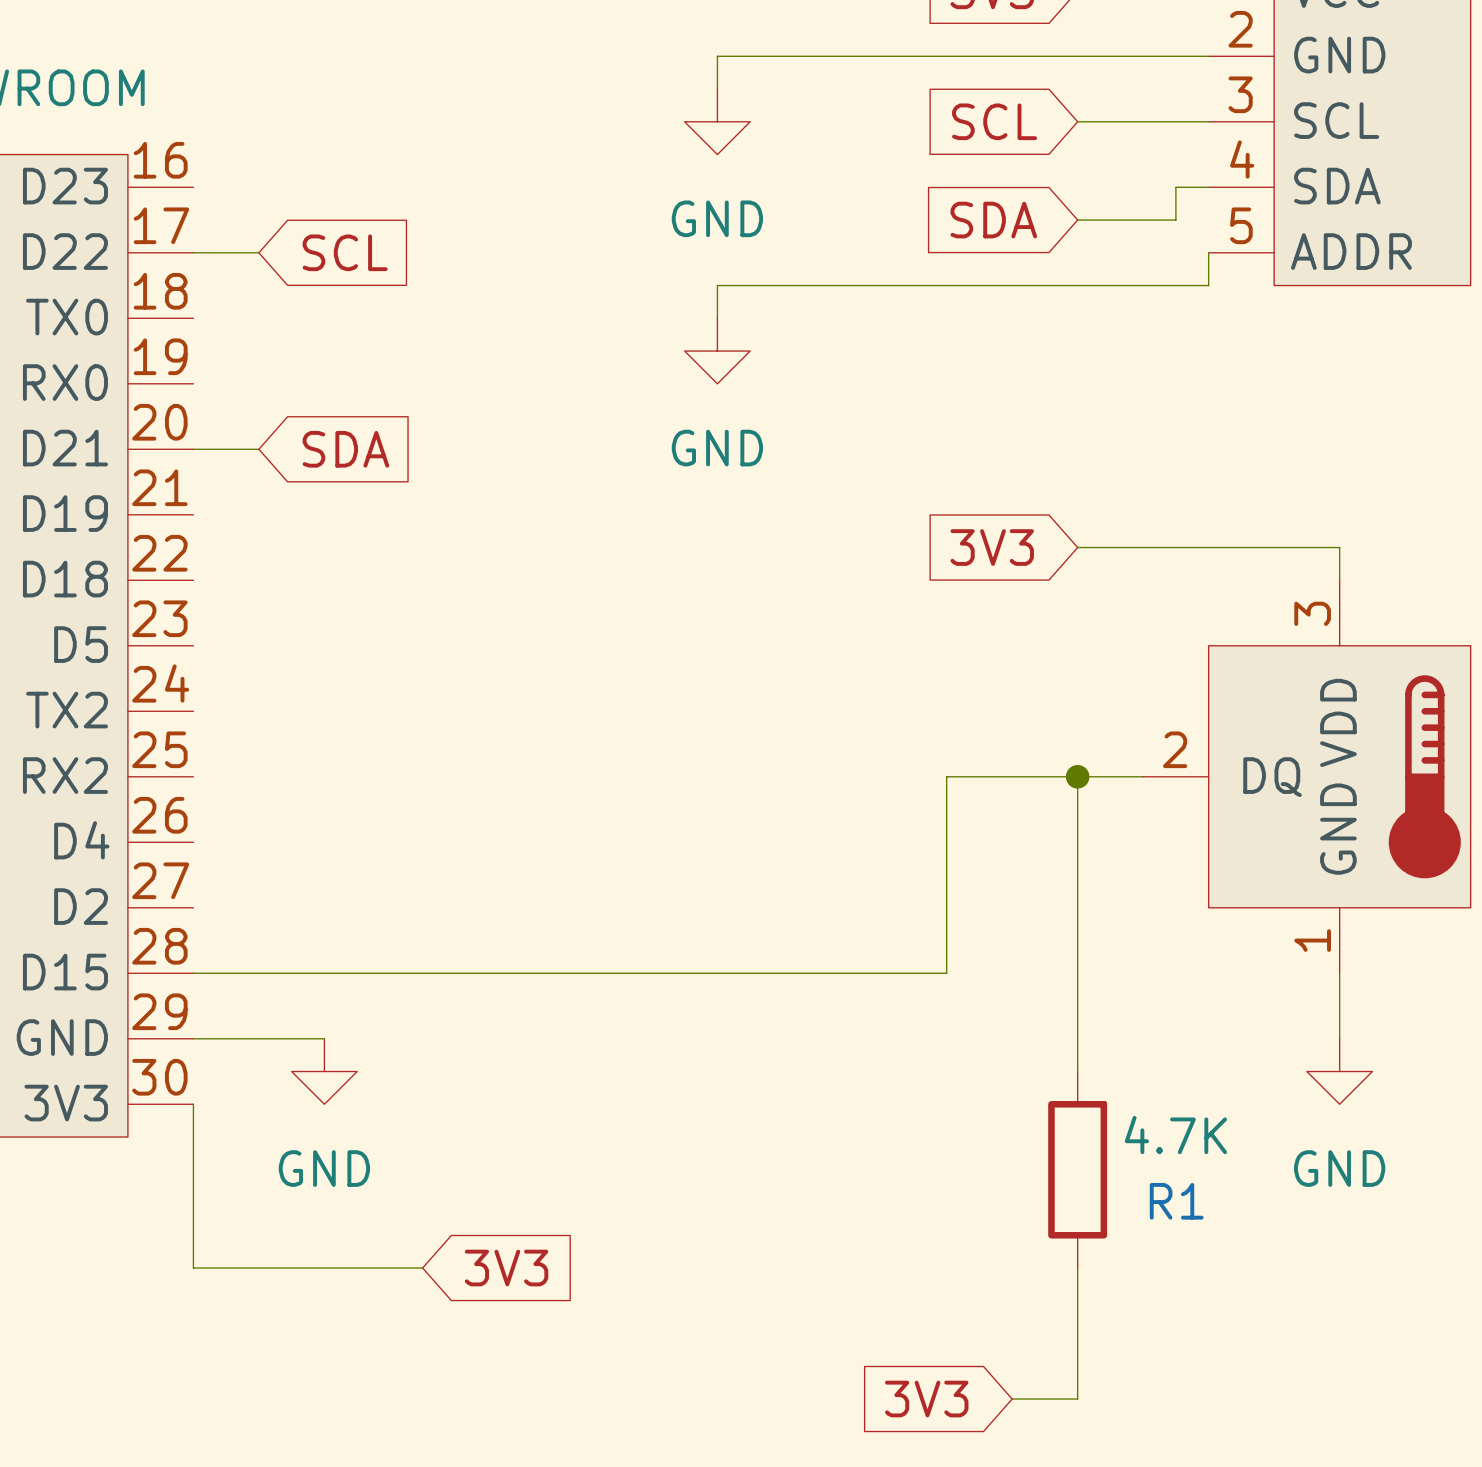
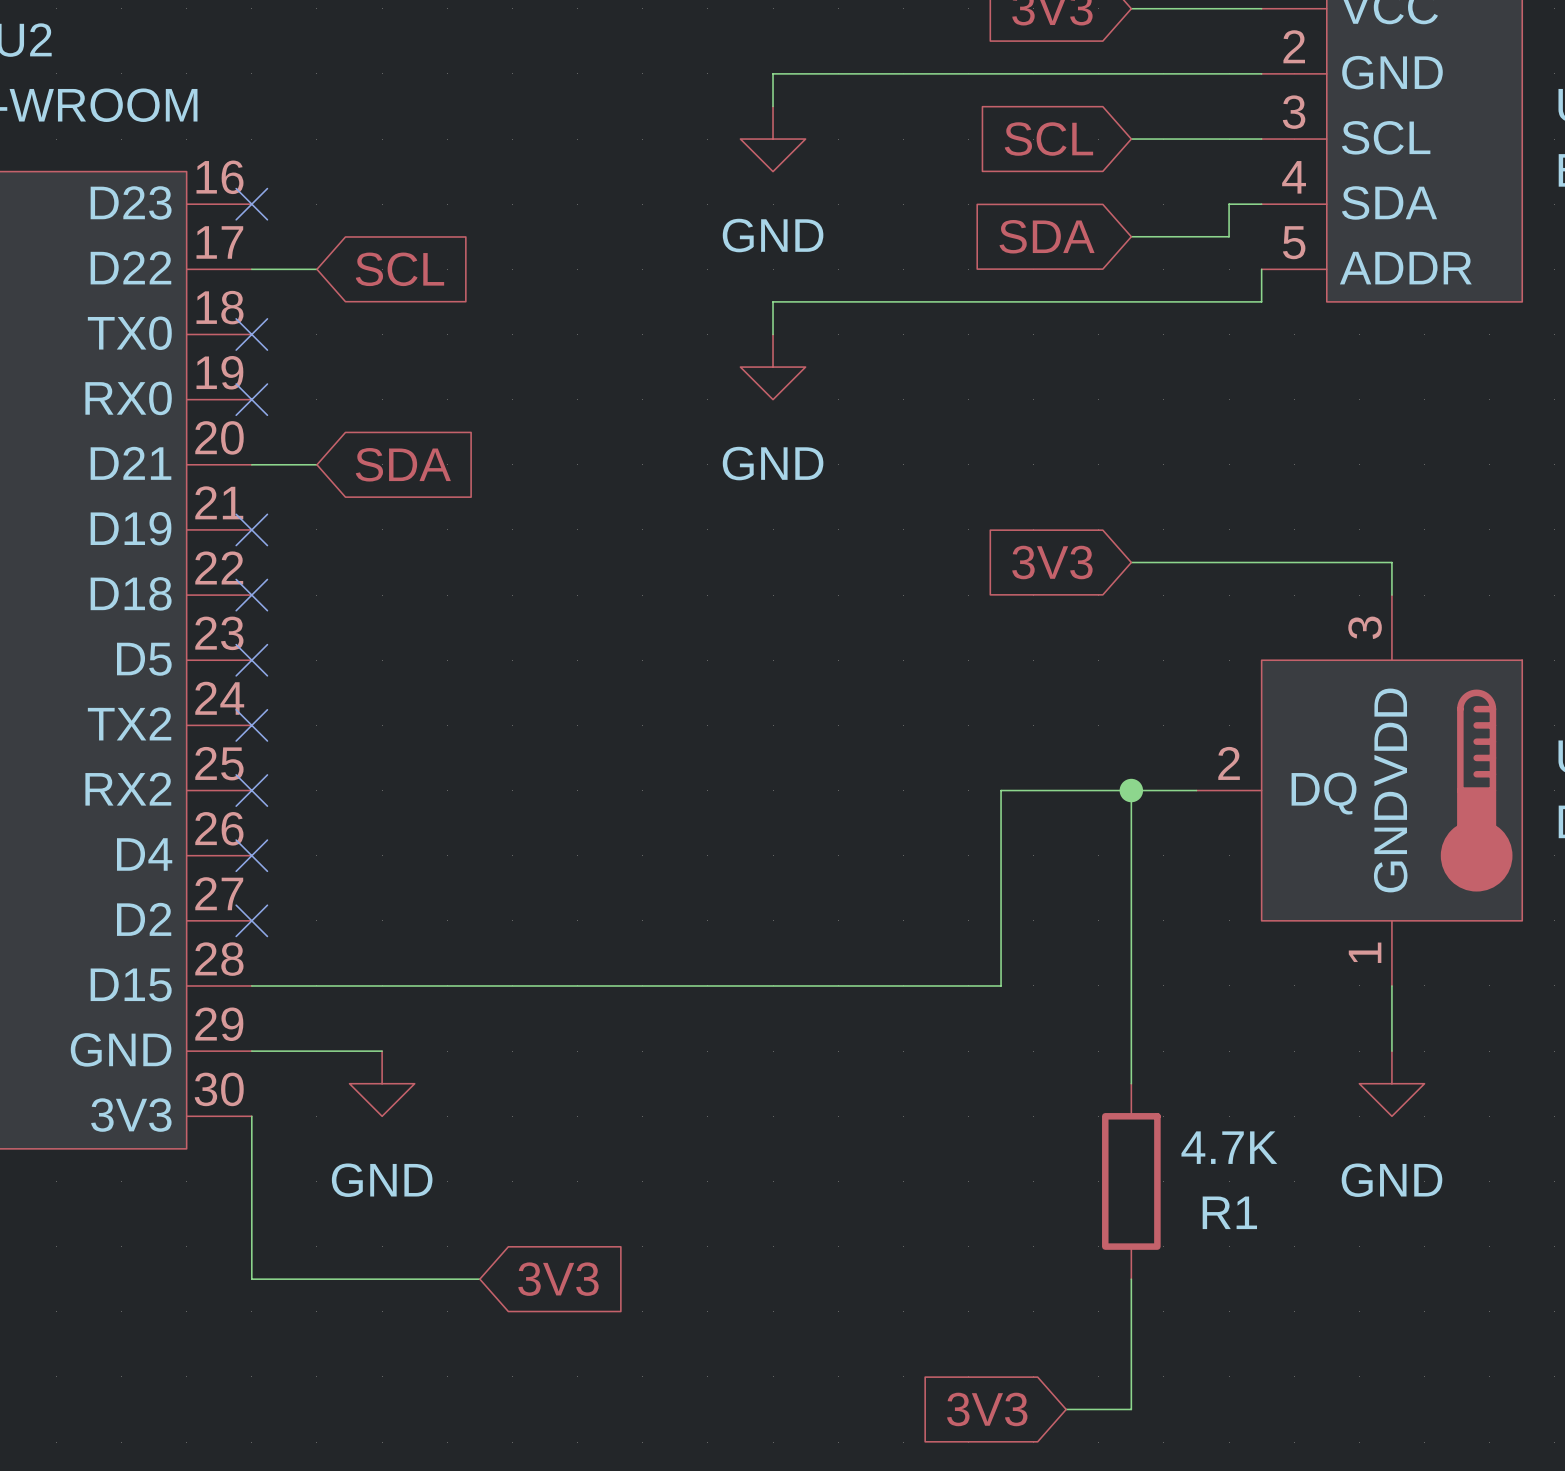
no-connect mark: none -> (251, 204)
no-connect mark: none -> (251, 334)
no-connect mark: none -> (251, 399)
no-connect mark: none -> (251, 529)
no-connect mark: none -> (251, 595)
no-connect mark: none -> (251, 660)
no-connect mark: none -> (251, 725)
no-connect mark: none -> (251, 790)
no-connect mark: none -> (251, 855)
no-connect mark: none -> (251, 920)

